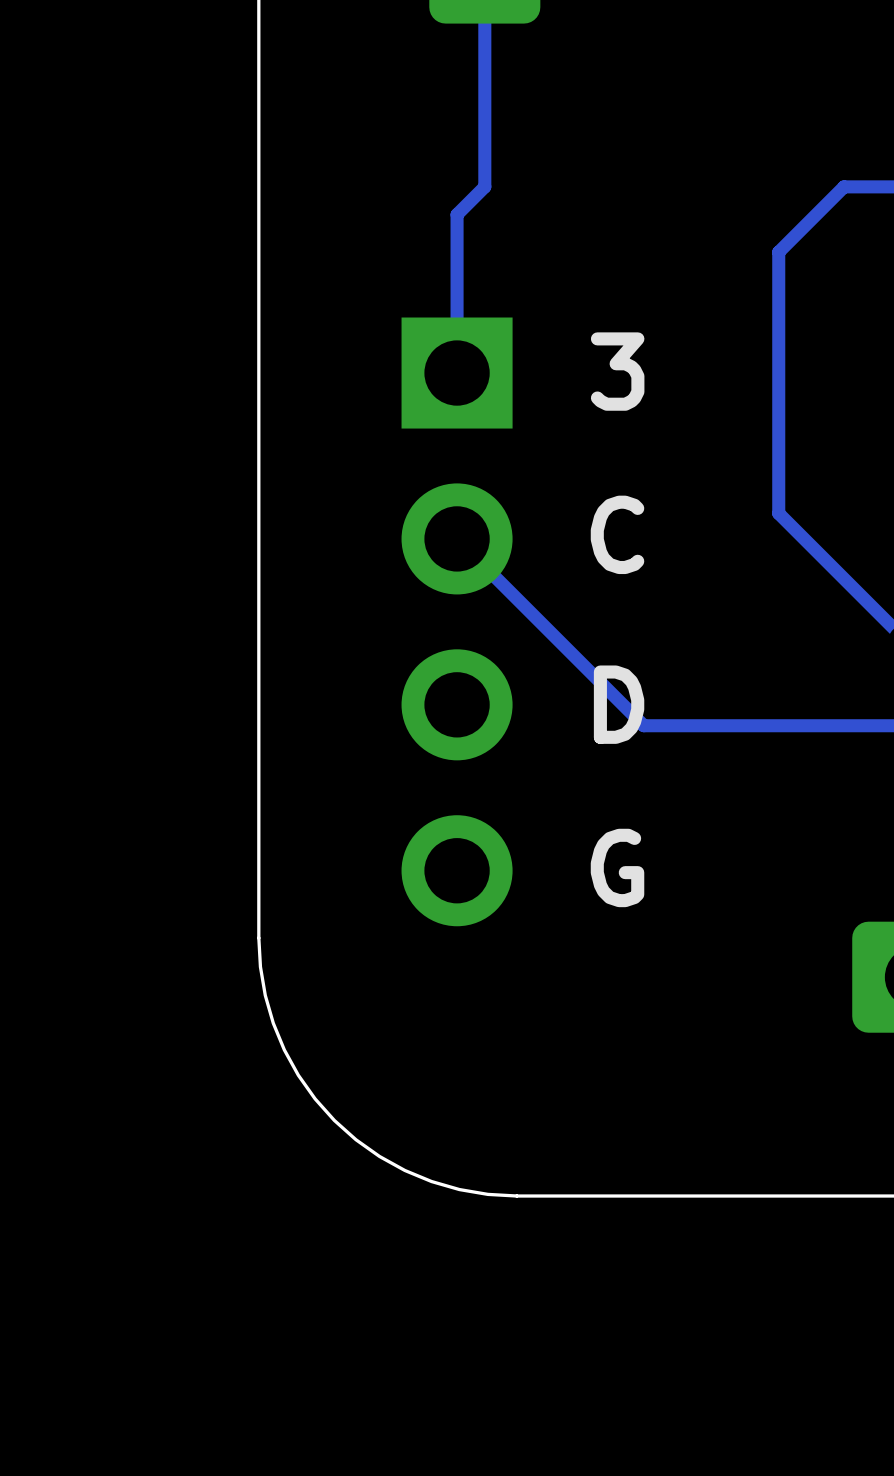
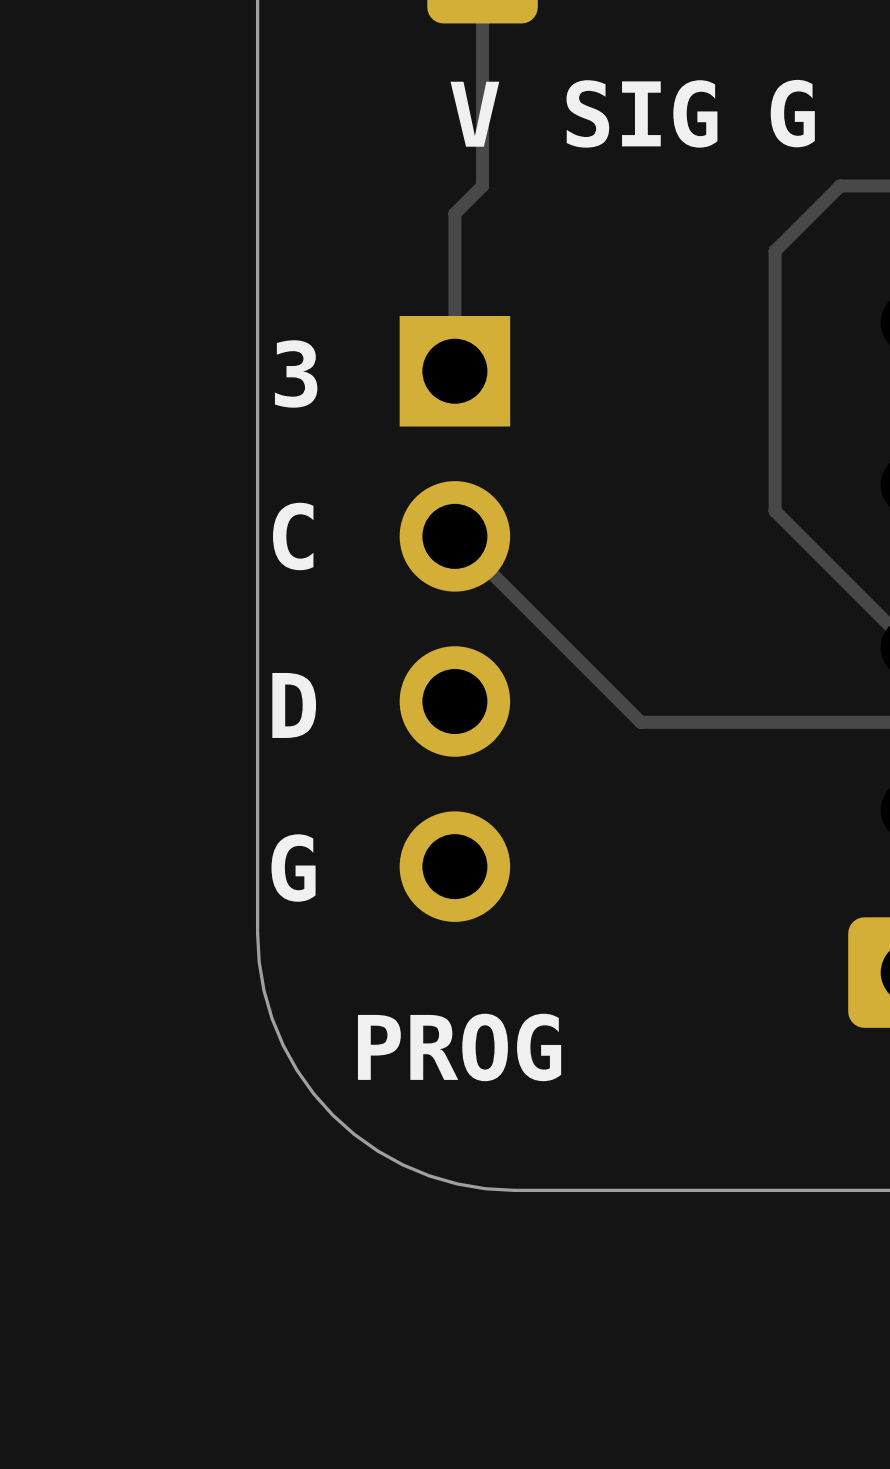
text: none -> V (474, 114)
text: none -> SIG (641, 113)
text: none -> G (792, 113)
text position: 3 (617, 371) -> 3 (296, 373)
text position: C (617, 534) -> C (293, 536)
text position: D (619, 704) -> D (294, 705)
text position: G (617, 867) -> G (293, 868)
text: none -> PROG (459, 1047)

